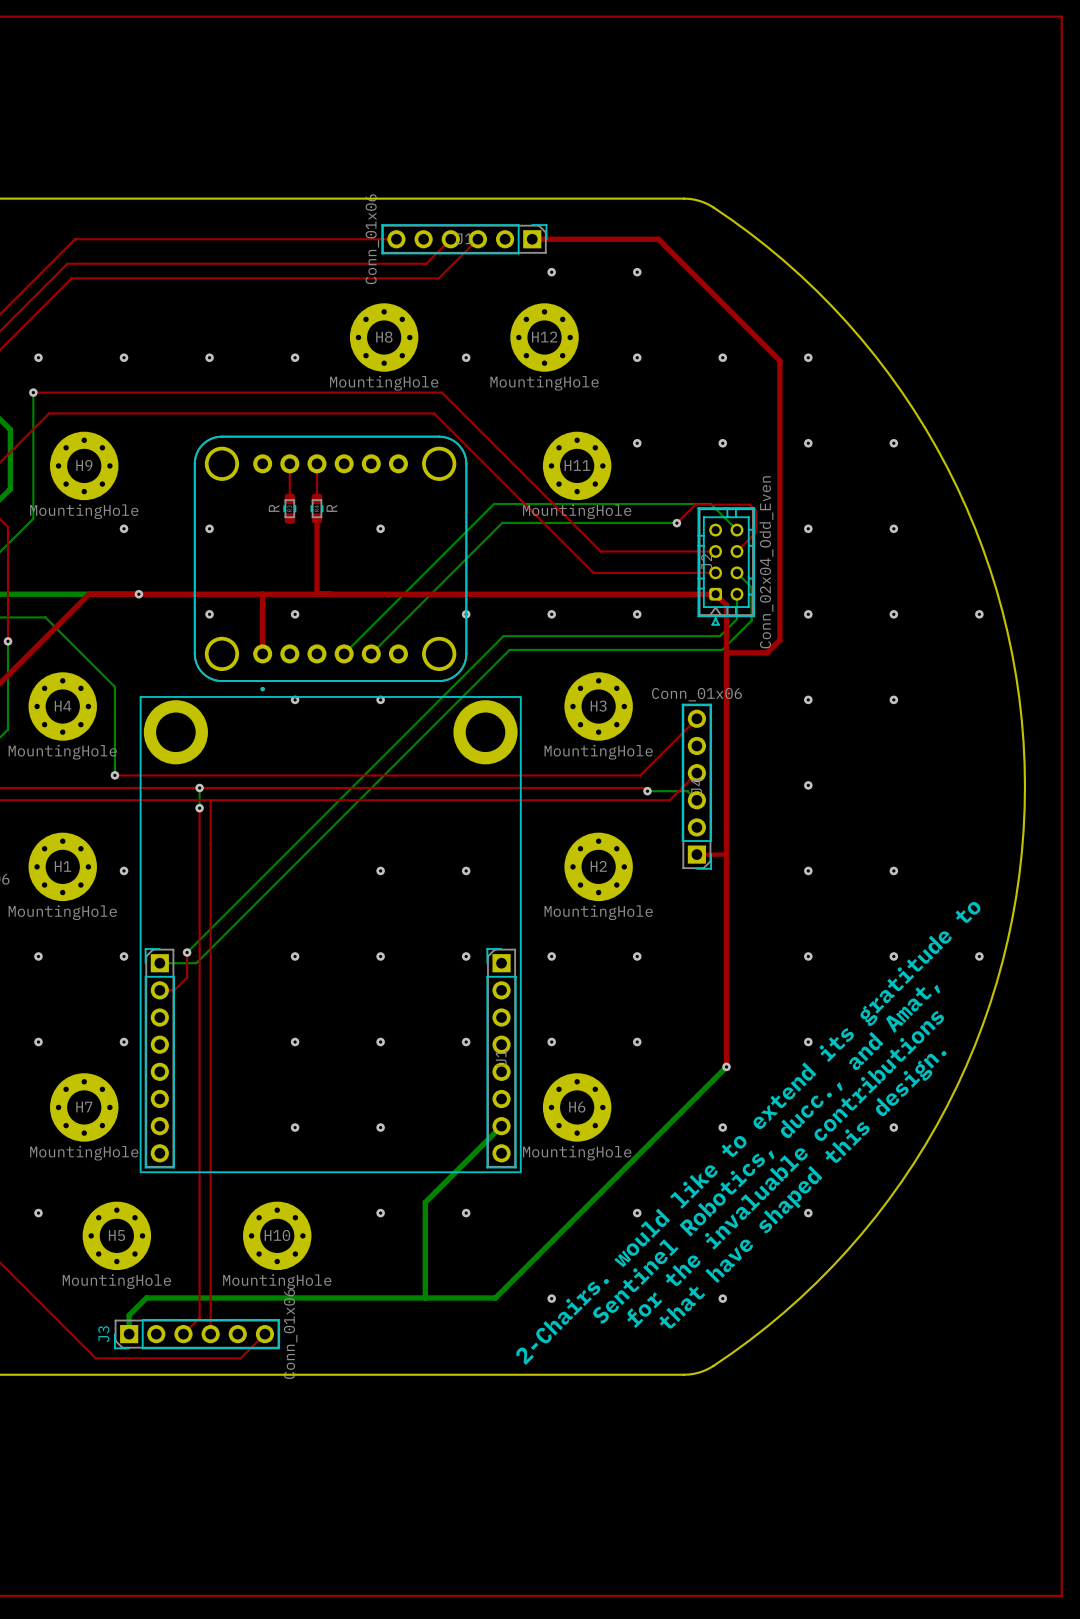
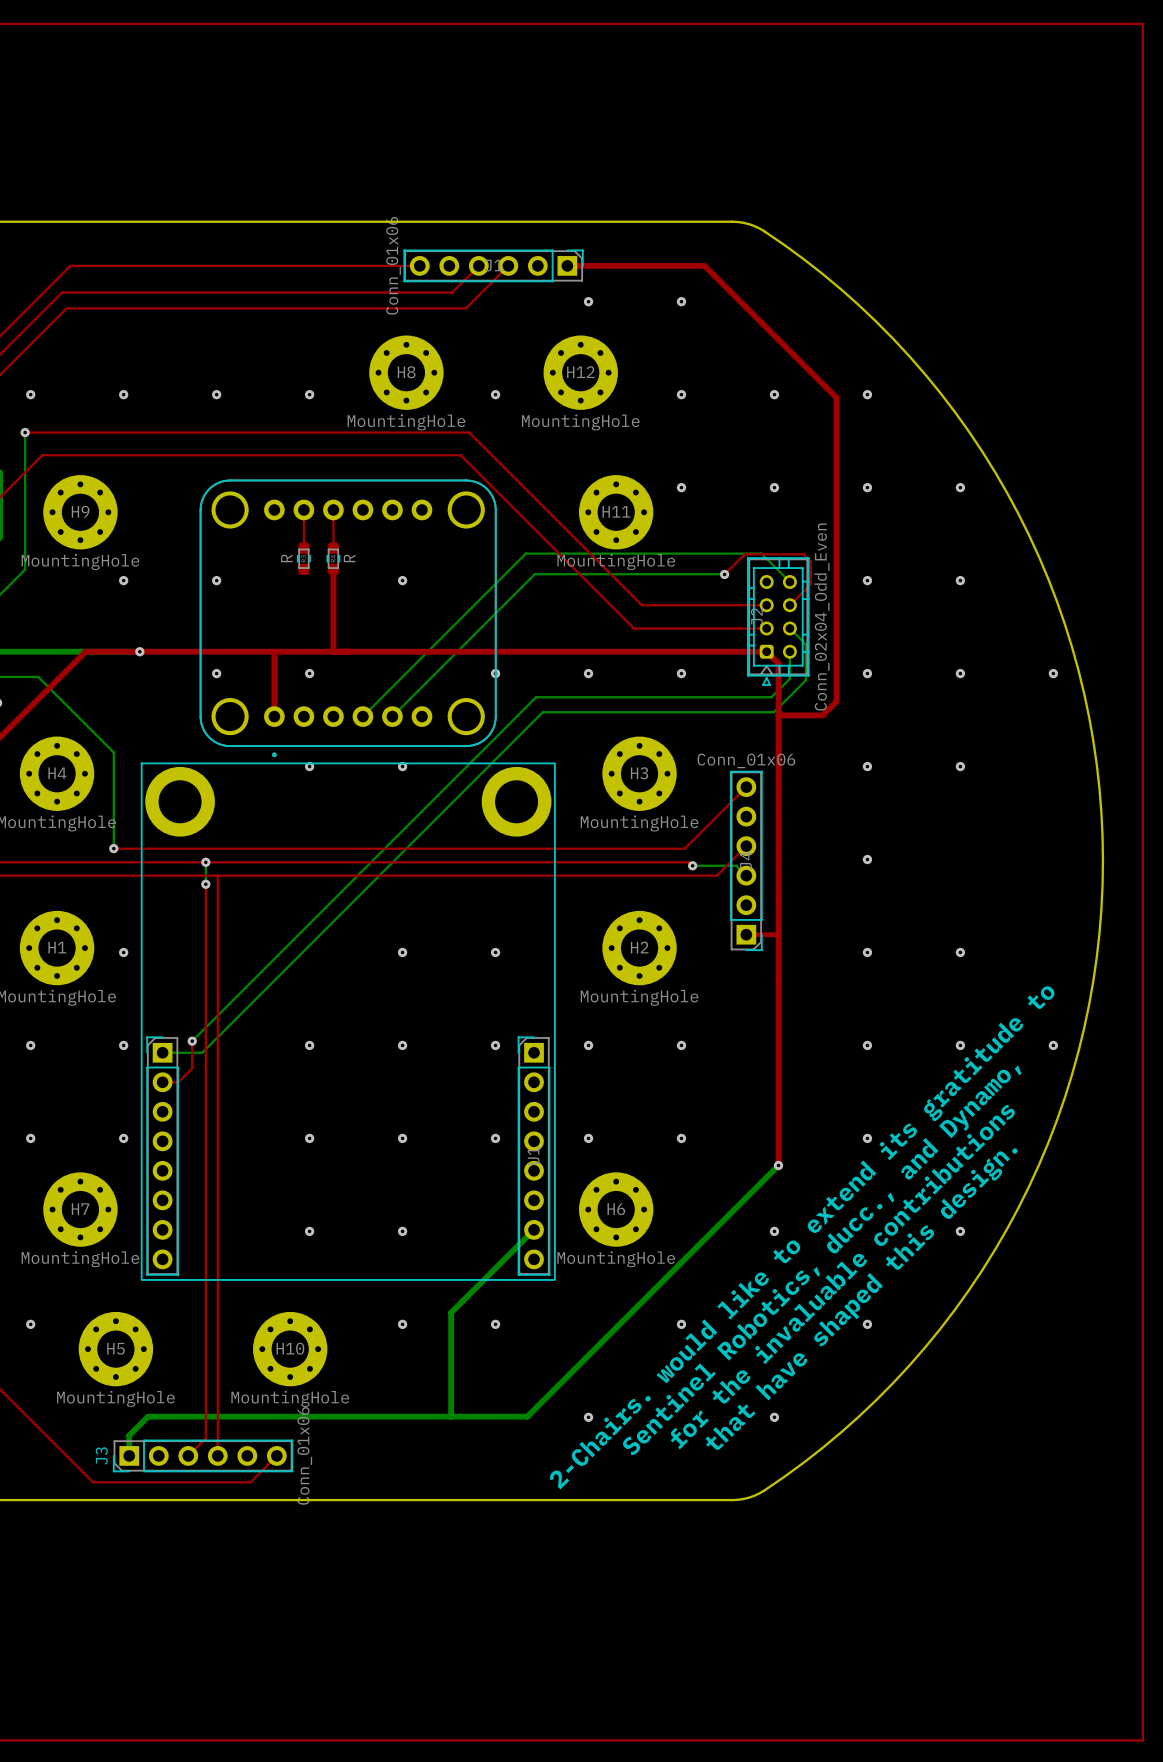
text: Sentinel Robotics, ducc., and Amat, (766, 1154) -> Sentinel Robotics, ducc., and Dynamo, (822, 1260)

